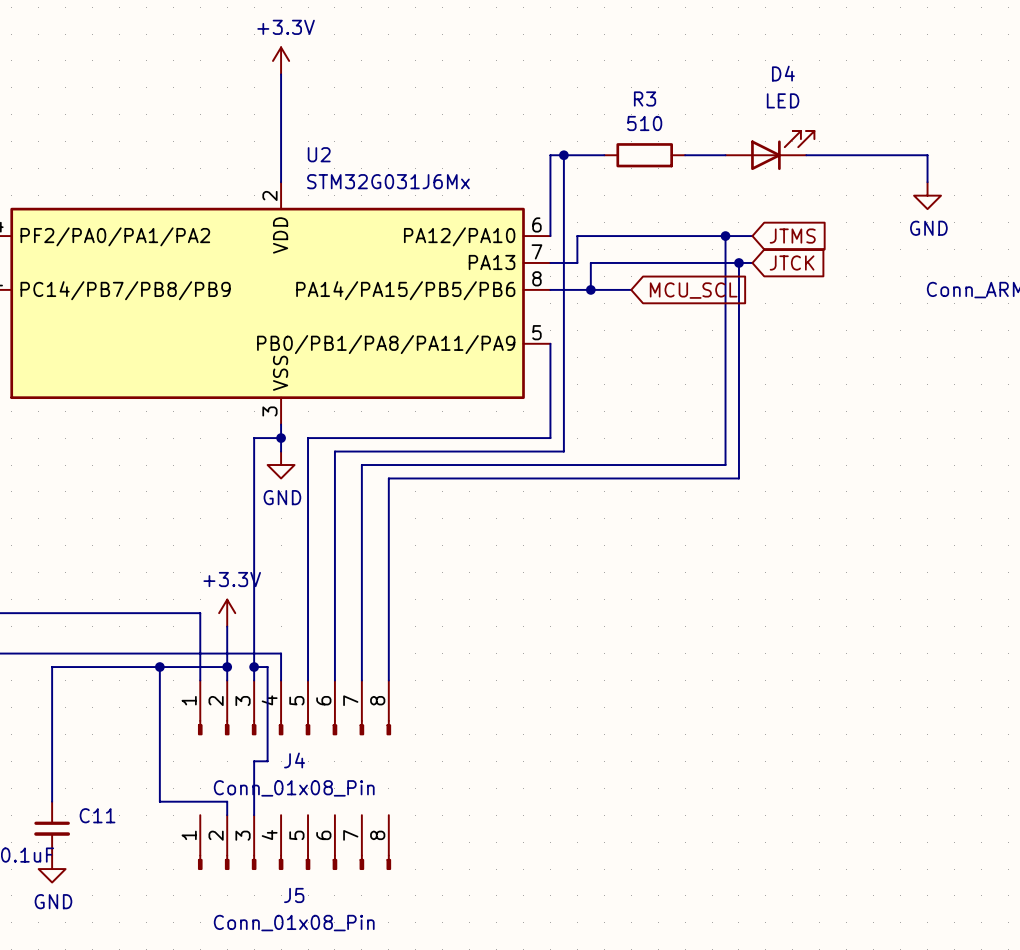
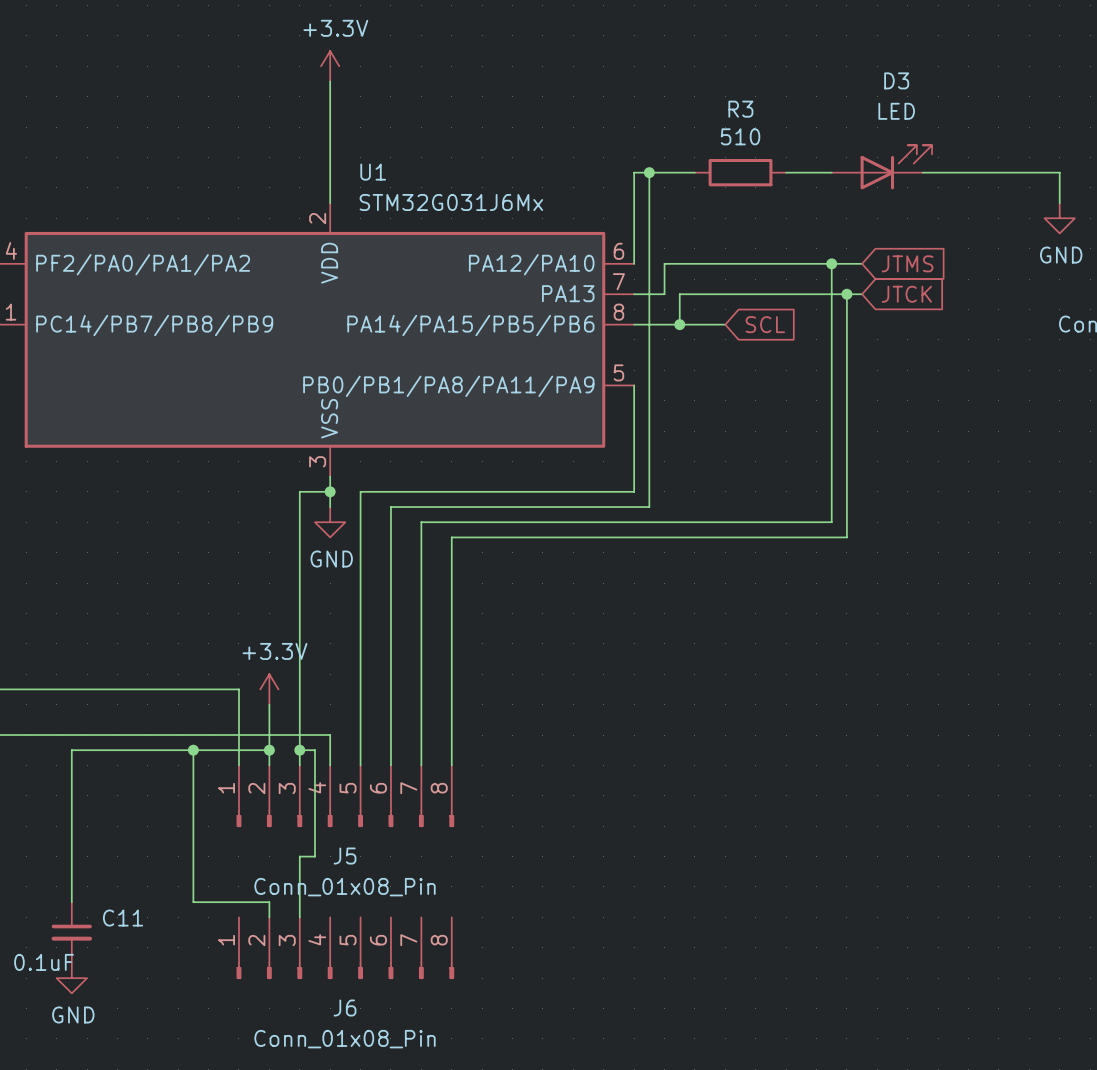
D4 name: D4 (783, 73) -> D3 (896, 80)
U2 name: U2 (319, 154) -> U1 (373, 172)
global label: MCU_SCL (693, 290) -> SCL (765, 324)
J4 name: J4 (294, 760) -> J5 (345, 856)
J5 name: J5 (294, 895) -> J6 (345, 1008)

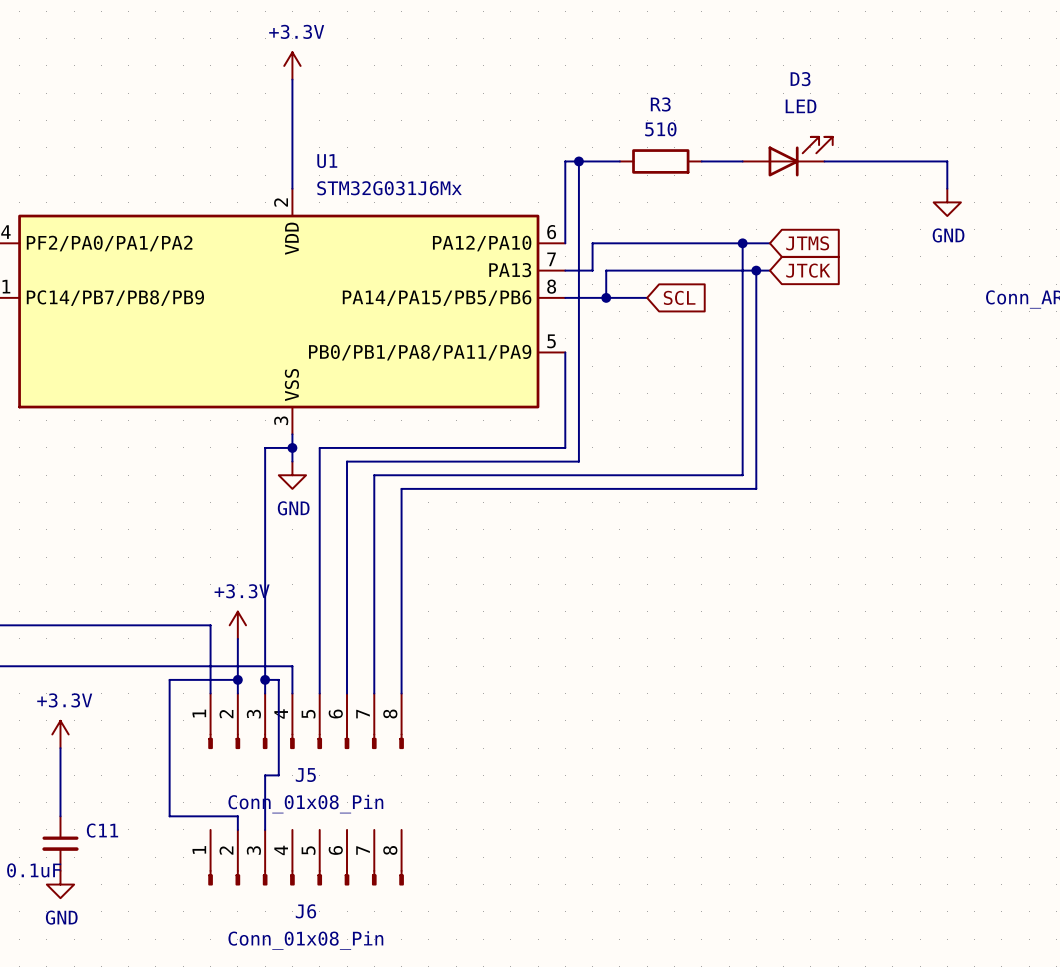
wire: (193, 750) (71, 750) (71, 826) -> none
junction: (193, 750) -> none
power symbol: none -> +3.3V (60, 734)

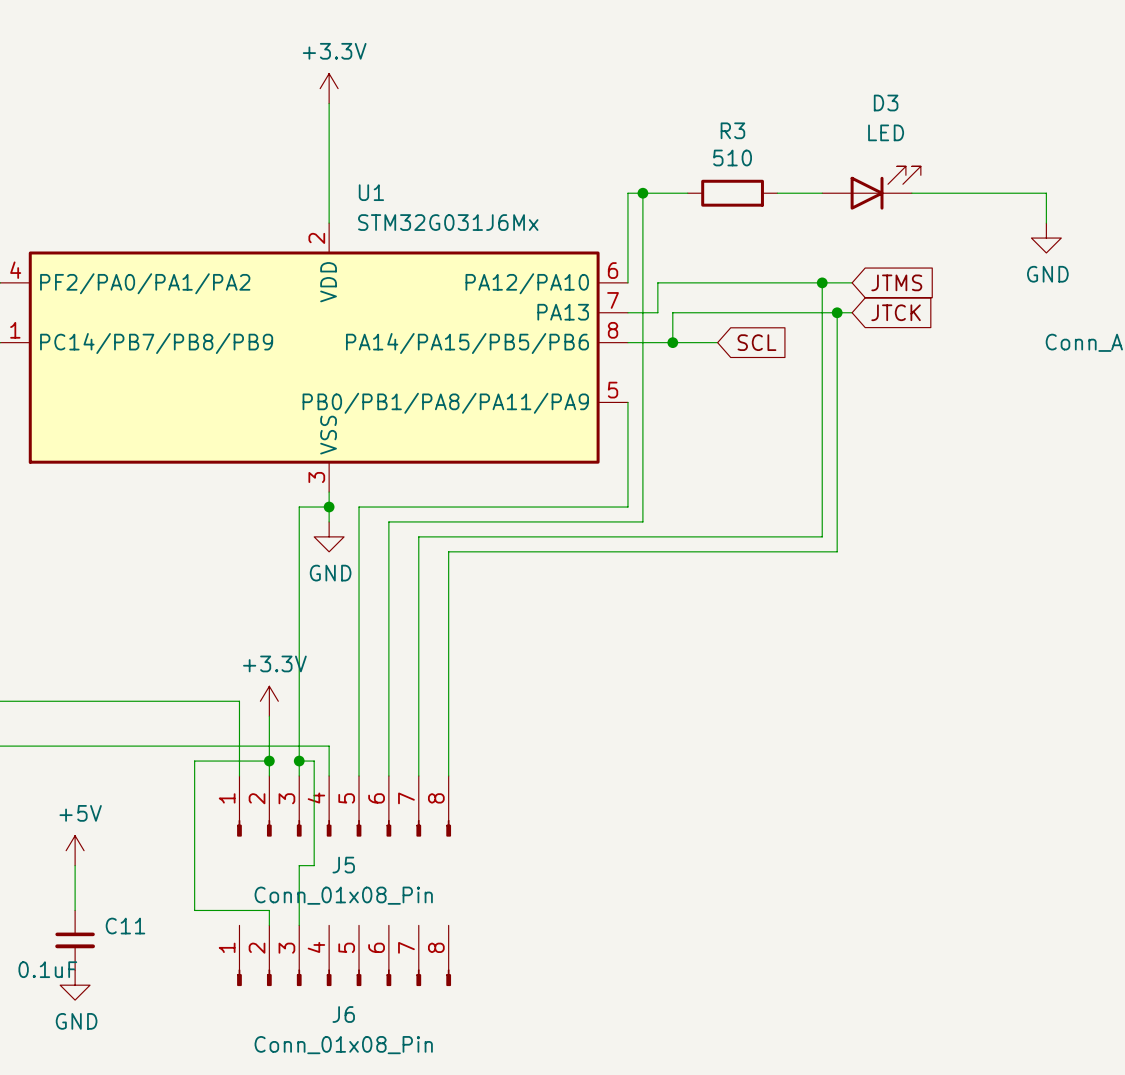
power symbol: +3.3V (60, 734) -> none
power symbol: none -> +5V (75, 850)

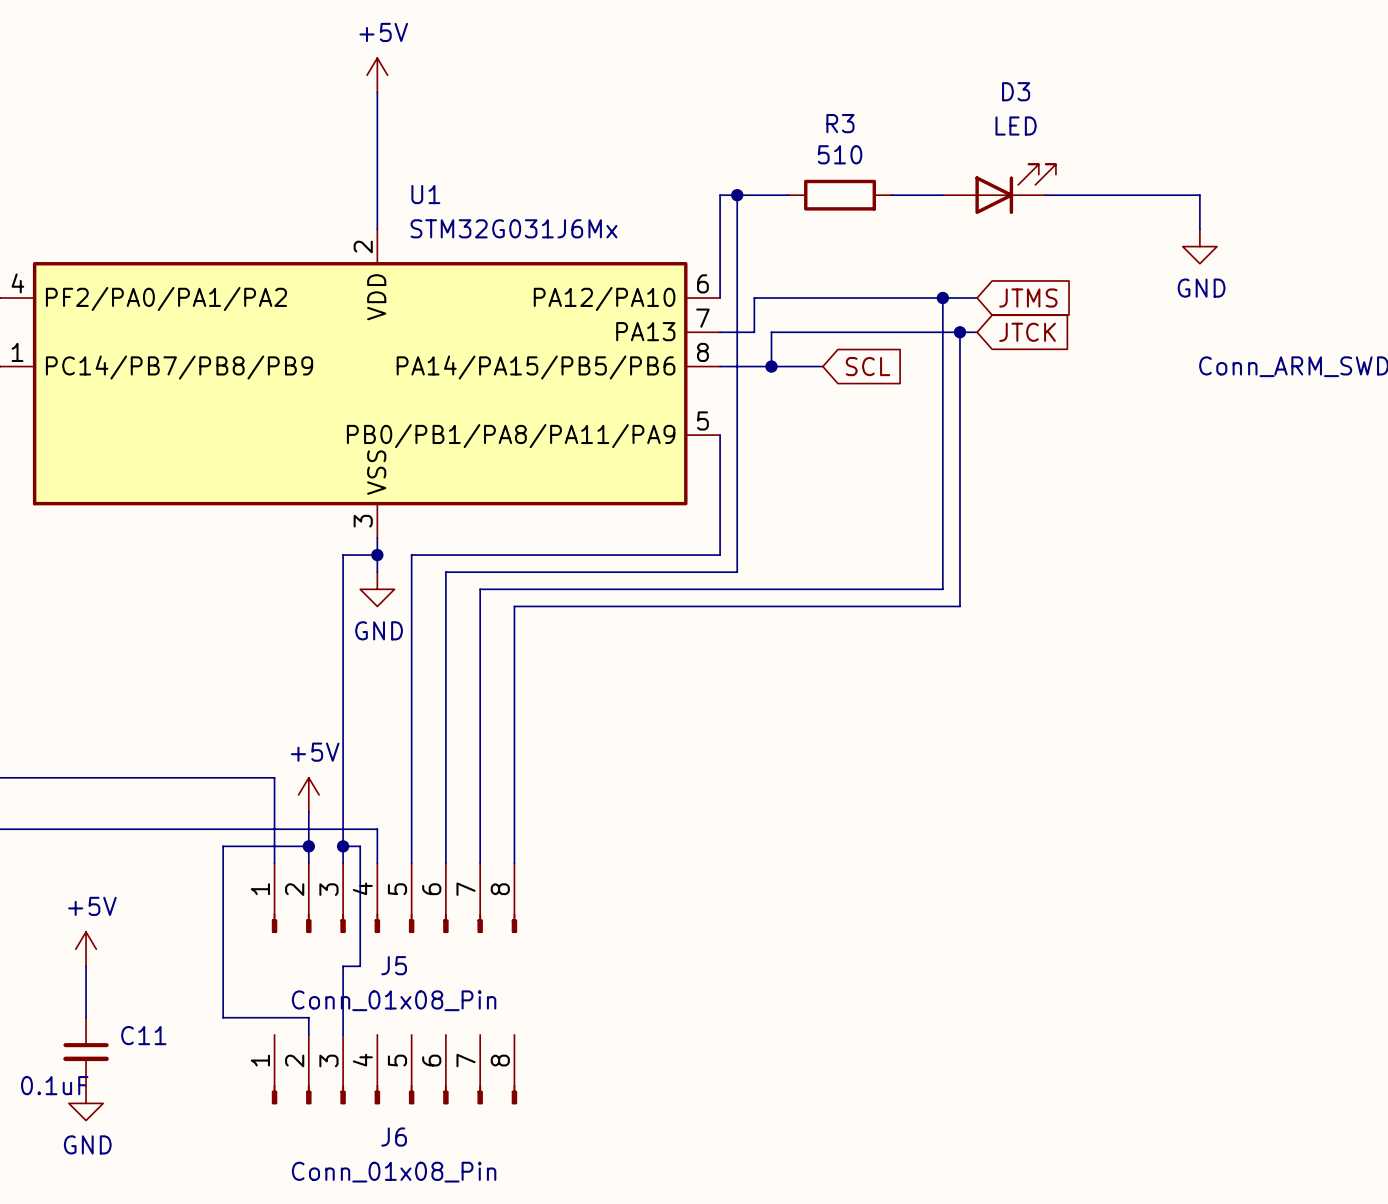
power symbol: +3.3V (329, 88) -> +5V (377, 75)
power symbol: +3.3V (269, 701) -> none
power symbol: none -> +5V (308, 794)

